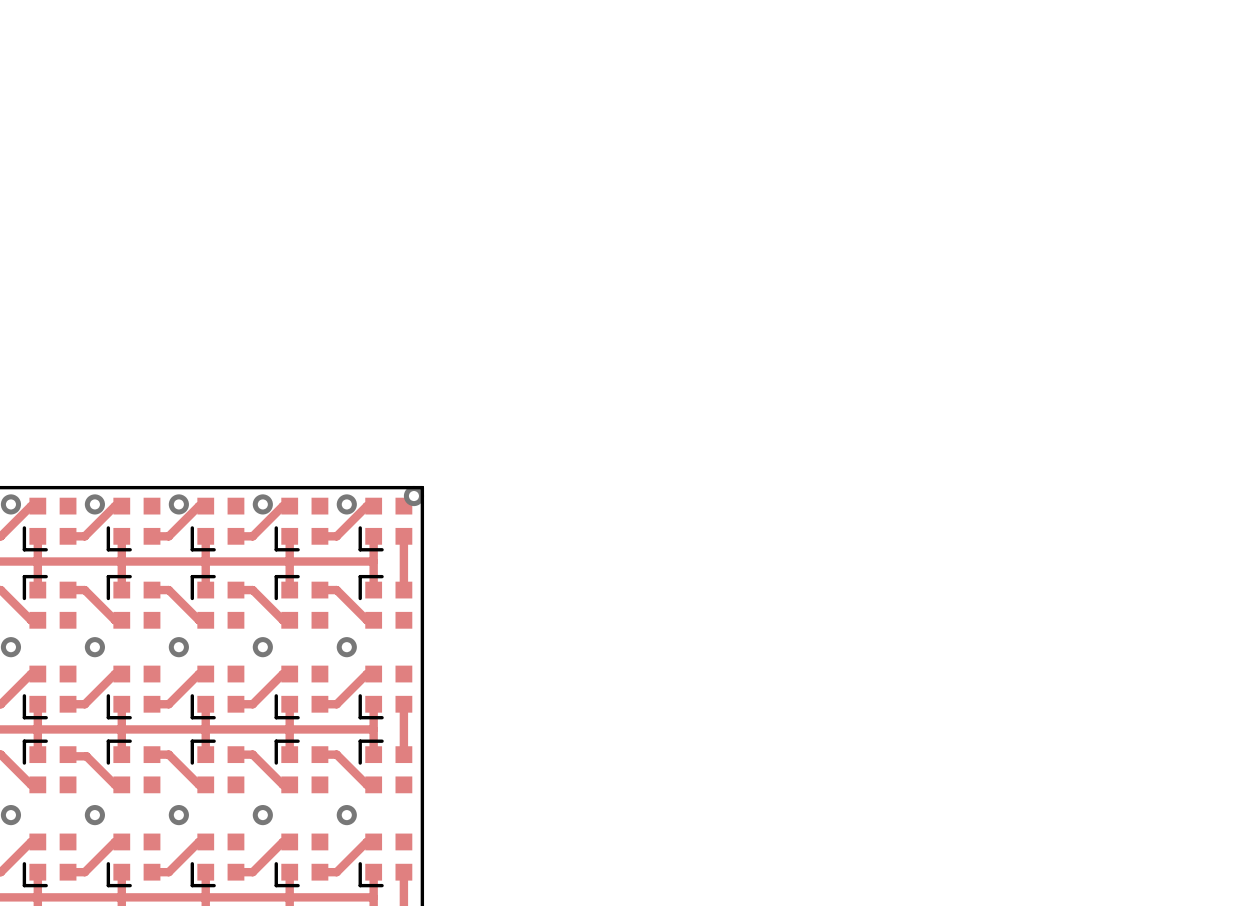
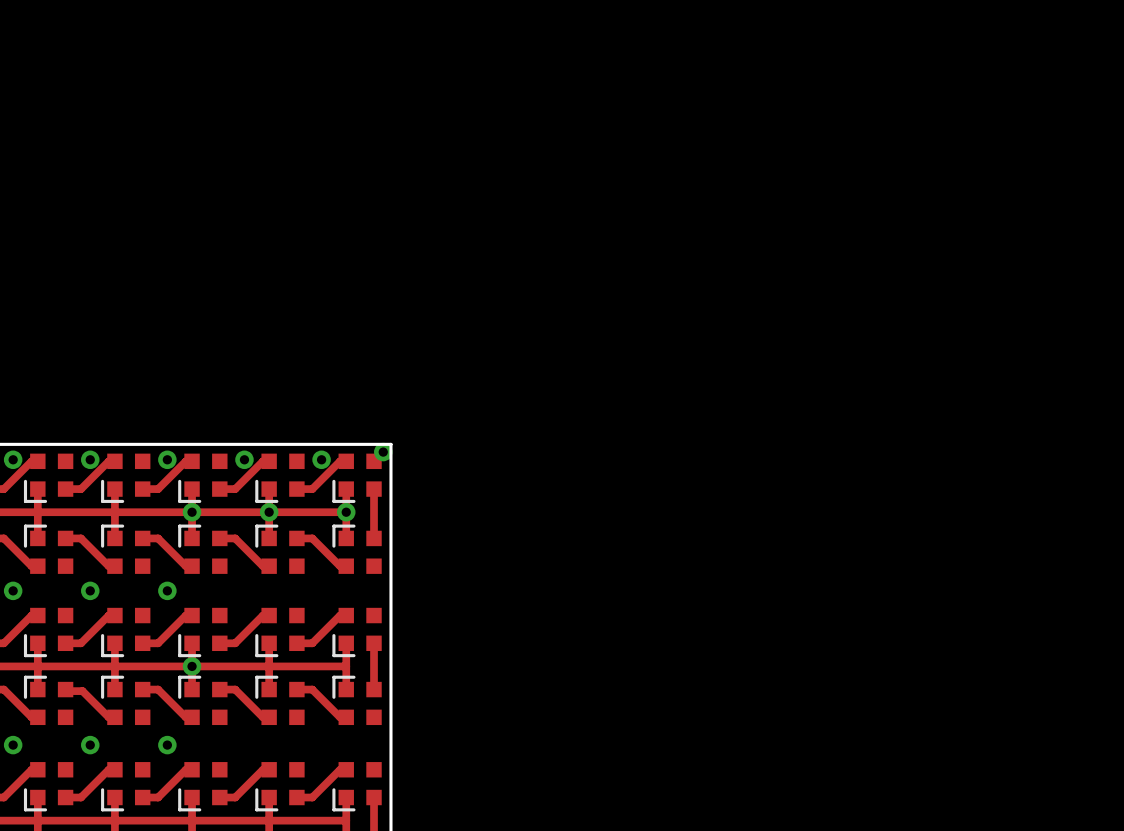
via: none -> (192, 512)
via: none -> (269, 512)
via: none -> (346, 512)
via: (262, 647) -> none
via: (346, 647) -> none
via: none -> (192, 666)
via: (262, 815) -> none
via: (346, 815) -> none

